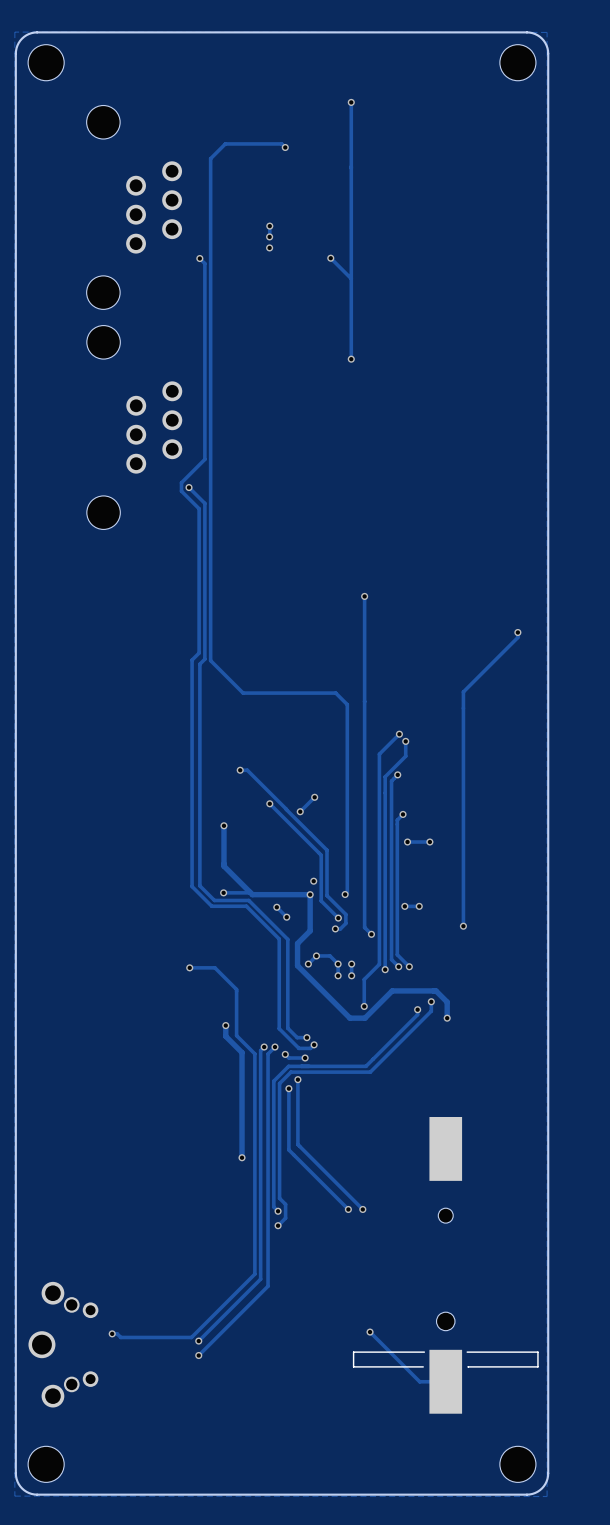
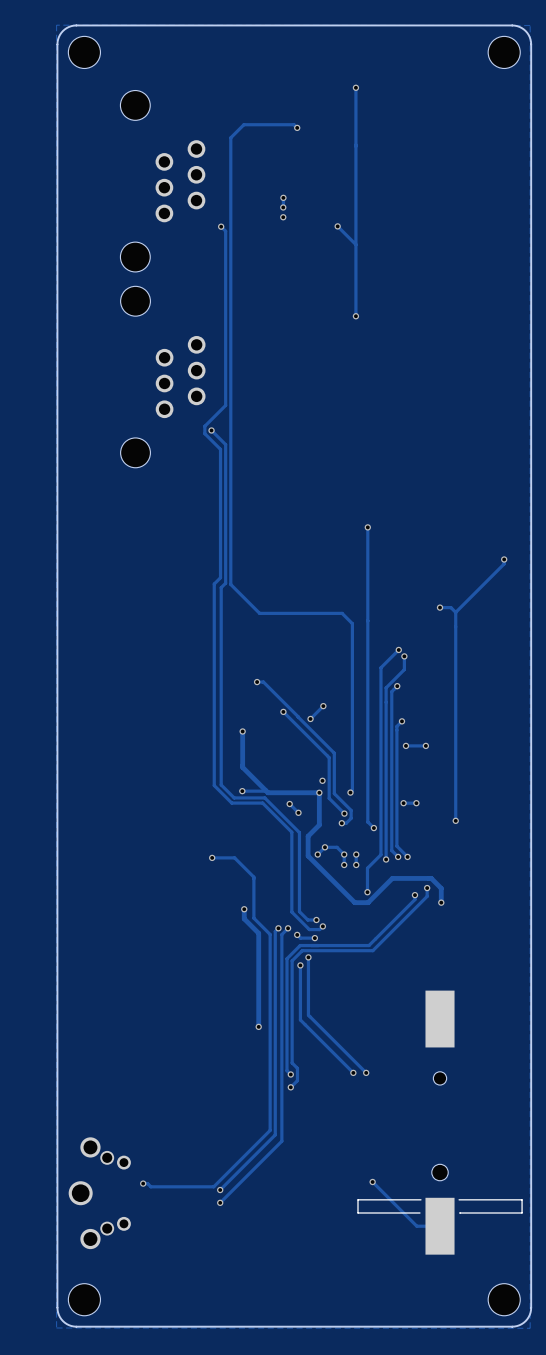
track: none -> (440, 607) (450, 607) (455, 612)
via: none -> (440, 607)

